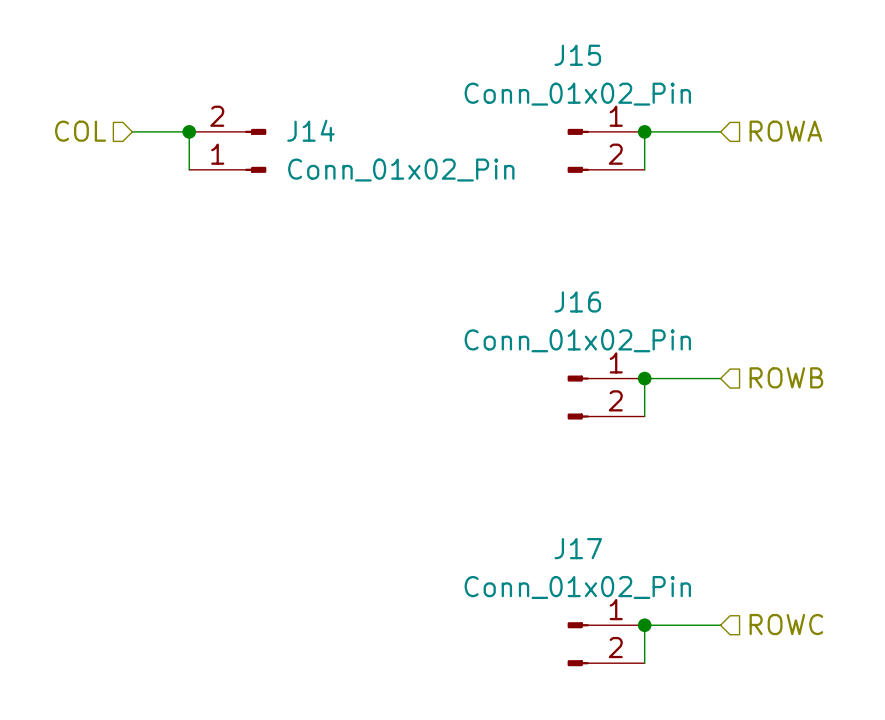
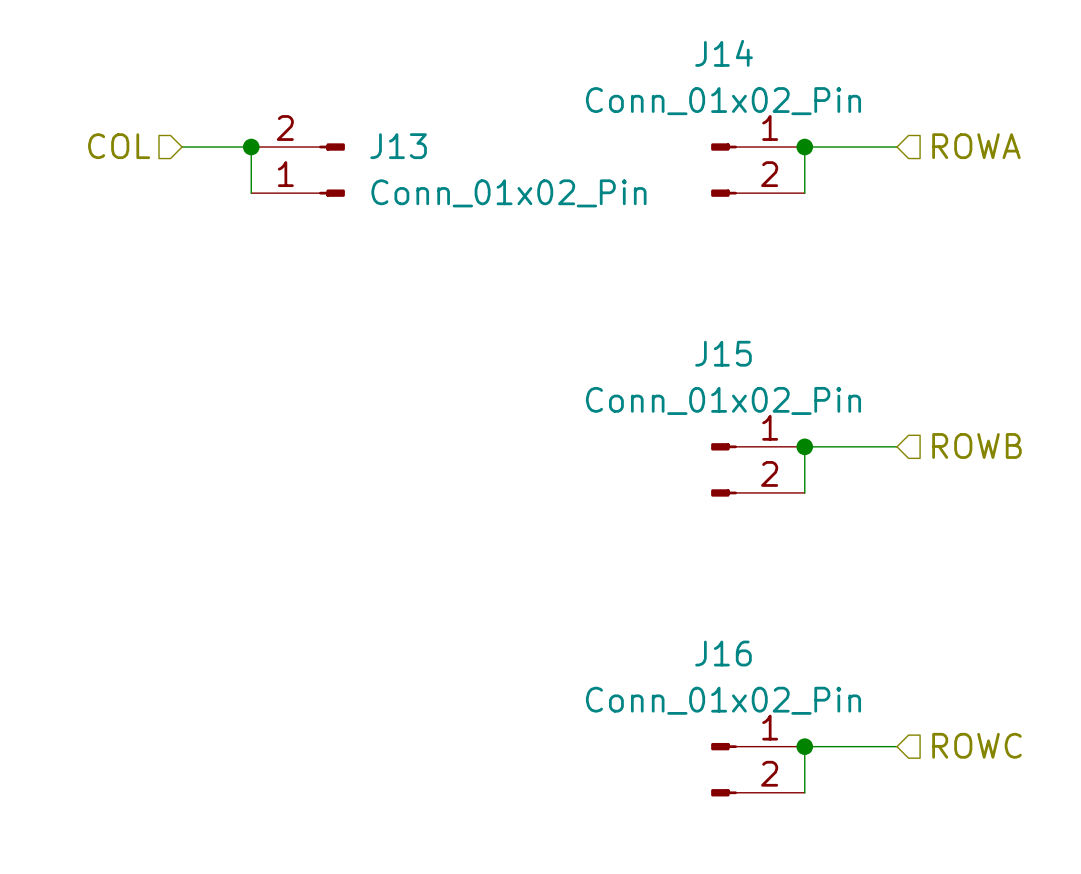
J15 name: J15 (577, 55) -> J14 (724, 53)
J14 name: J14 (310, 130) -> J13 (398, 146)
J16 name: J16 (577, 301) -> J15 (723, 353)
J17 name: J17 (578, 548) -> J16 (723, 653)

